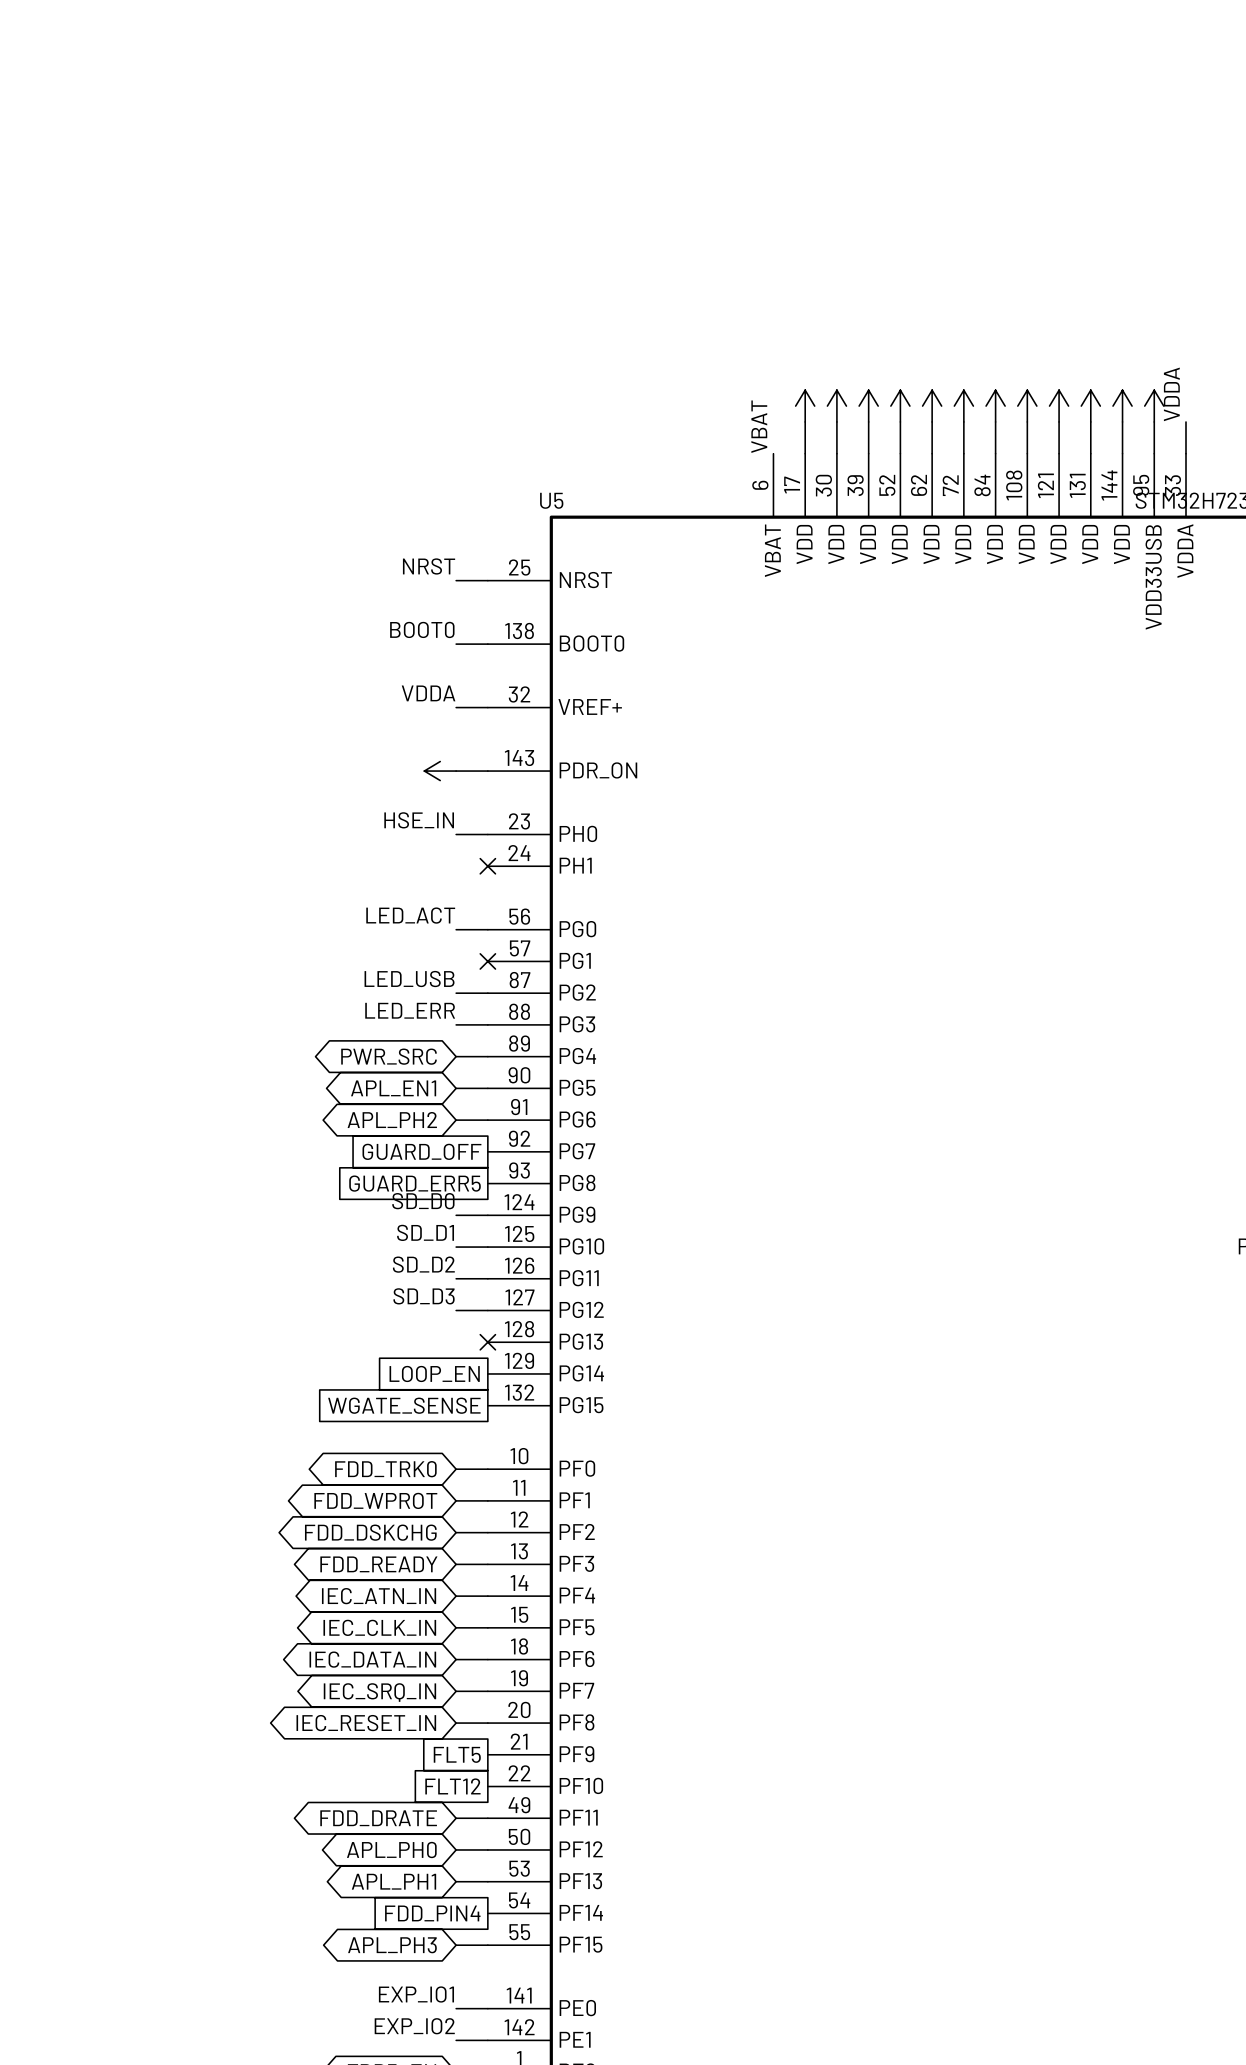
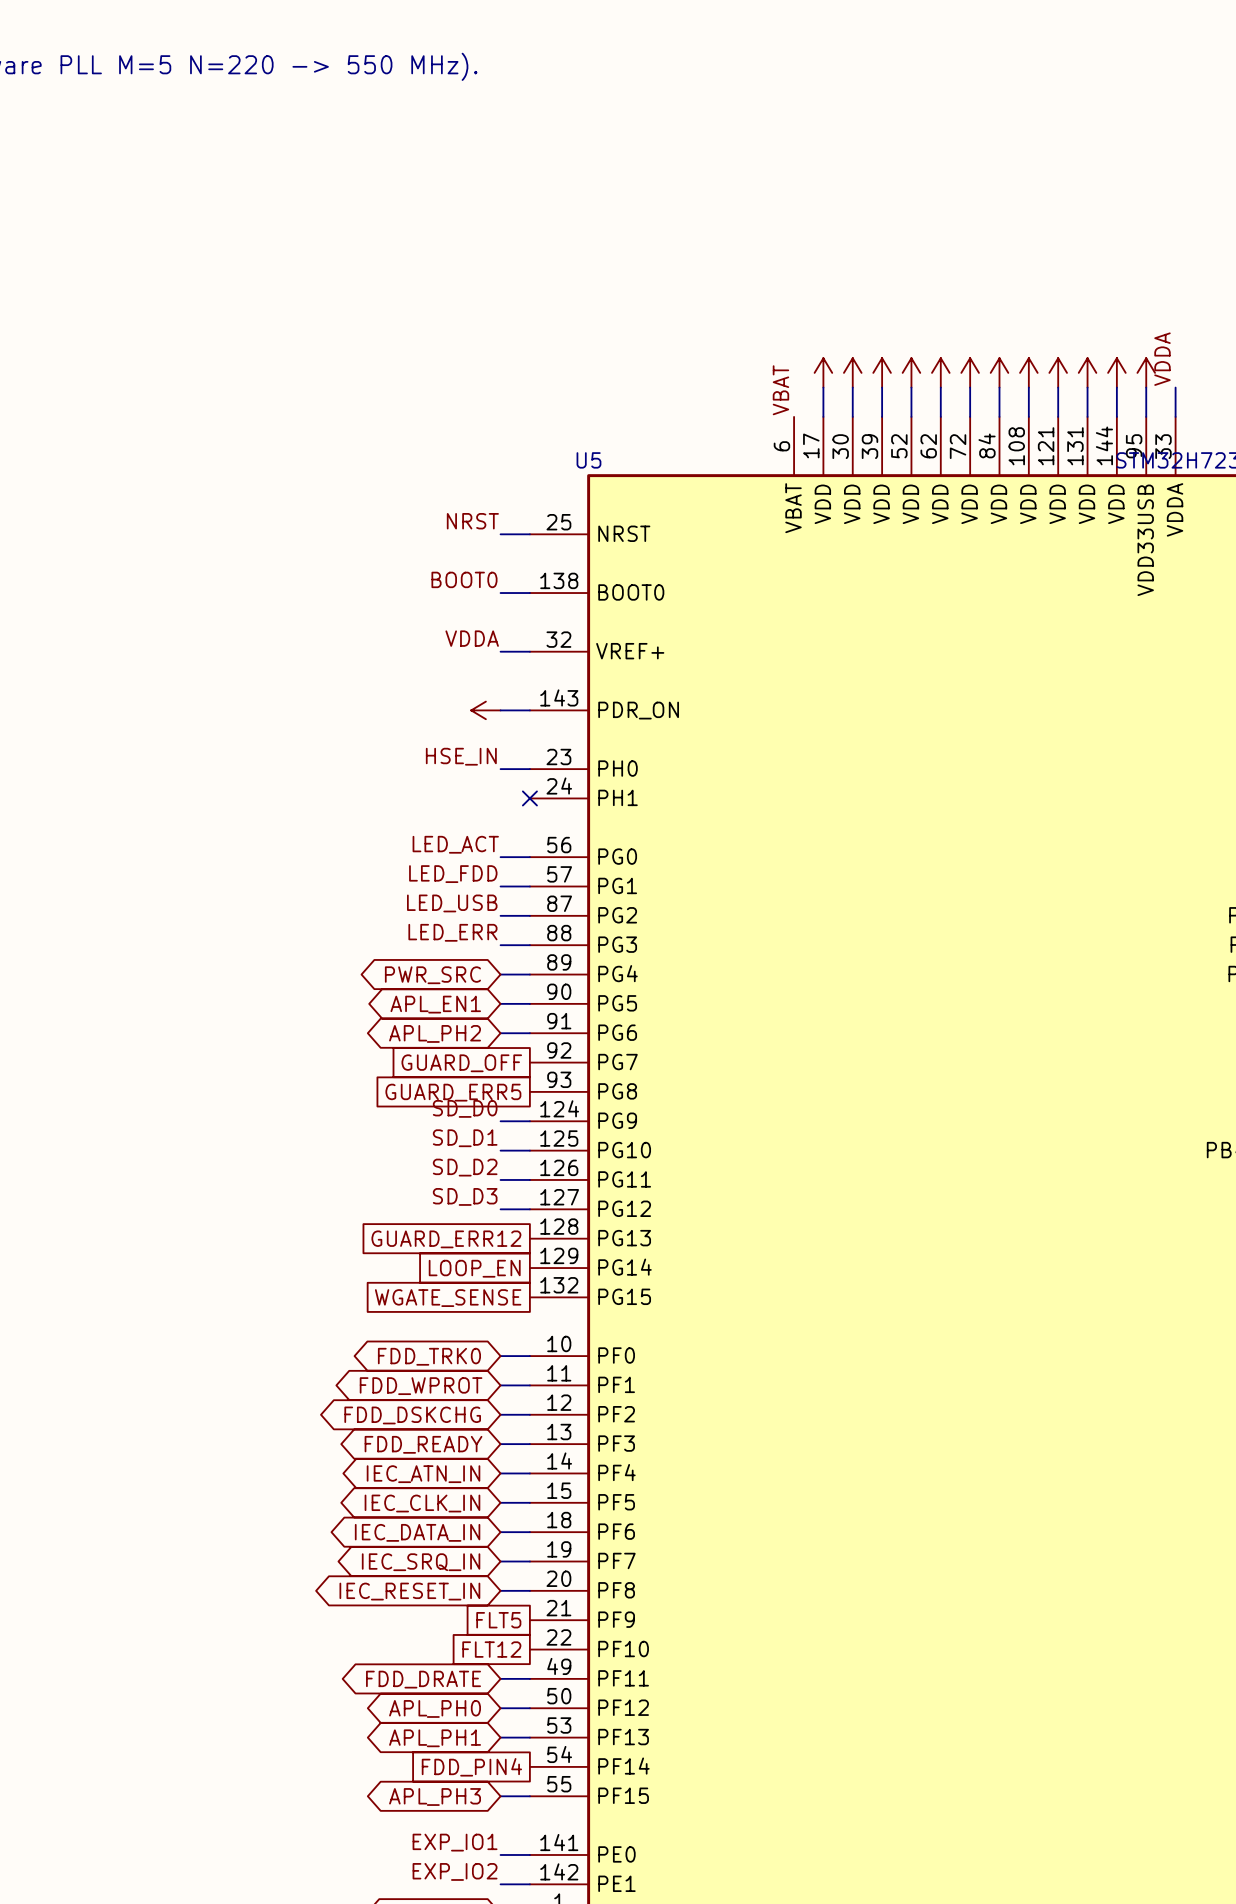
label: none -> LED_FDD (453, 874)
wire: none -> (500, 886) (529, 886)
no-connect mark: (487, 961) -> none
global label: none -> GUARD_ERR12 (446, 1239)
no-connect mark: (487, 1342) -> none

